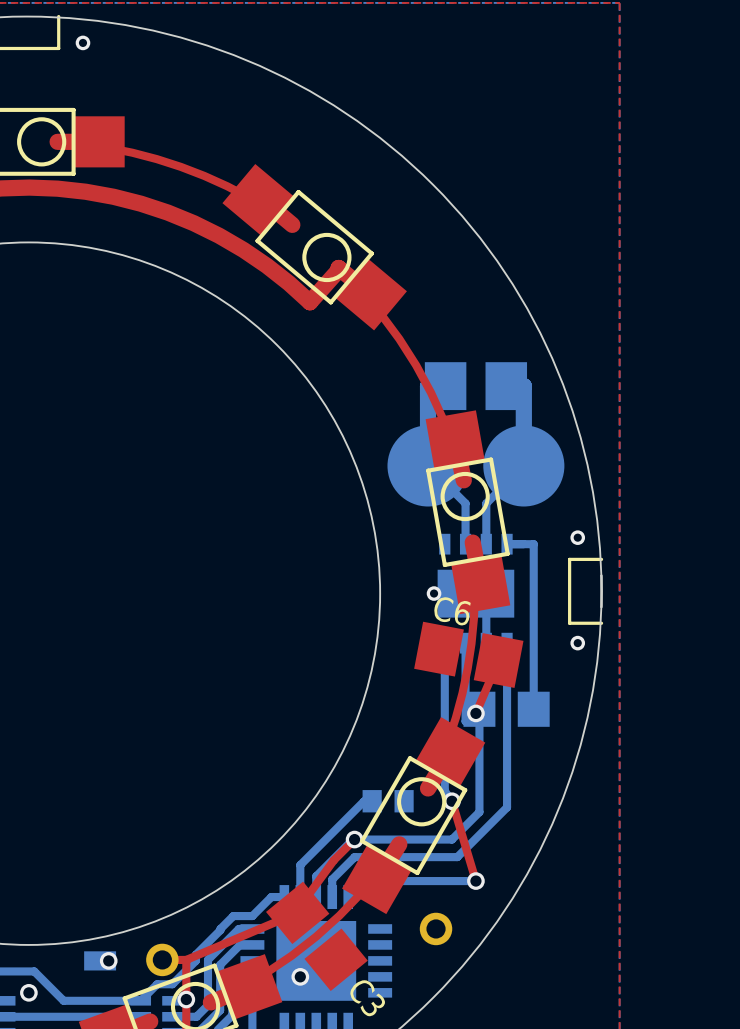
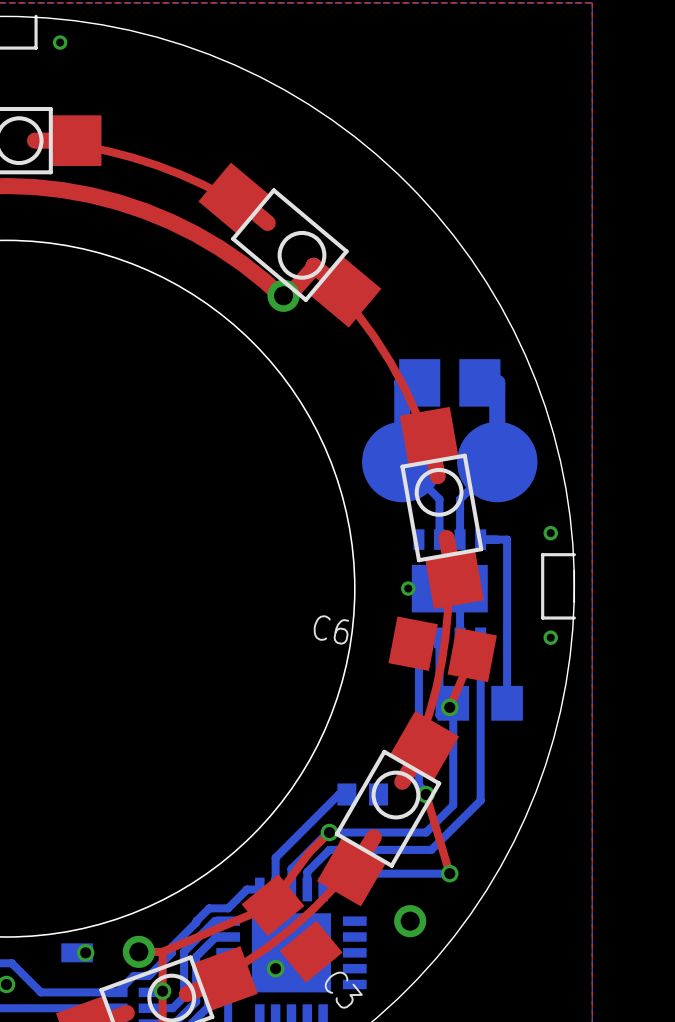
part: none -> (283, 295)
C6 name position: C6 (452, 611) -> C6 (331, 629)

